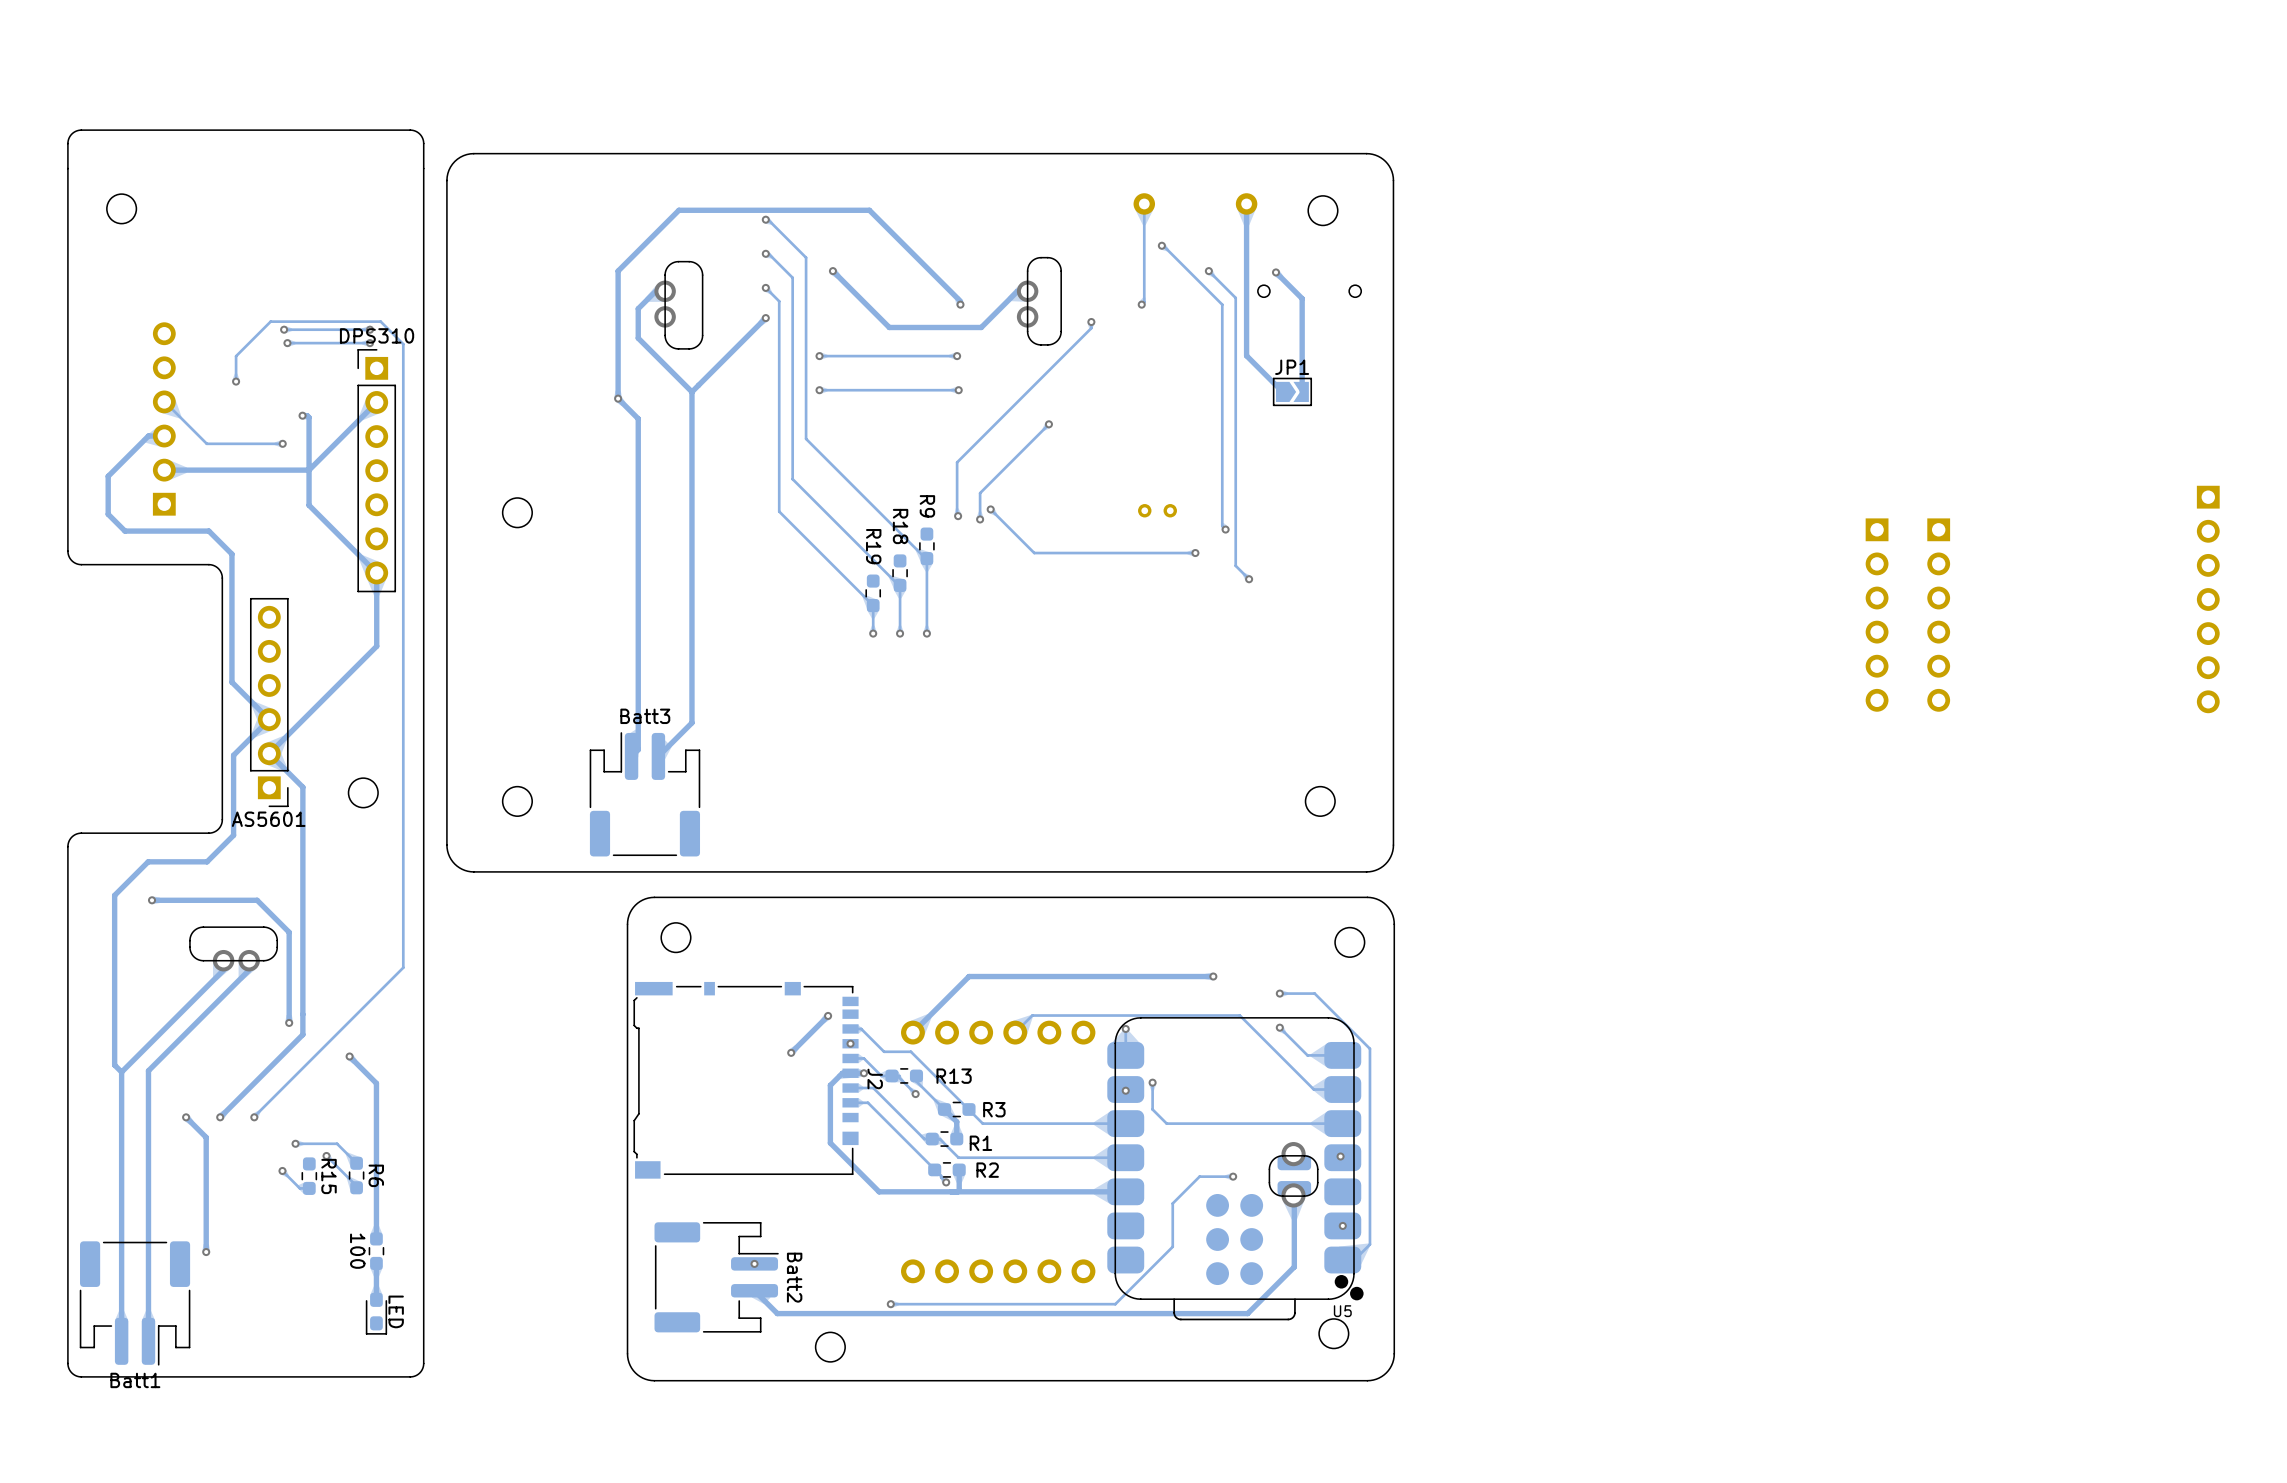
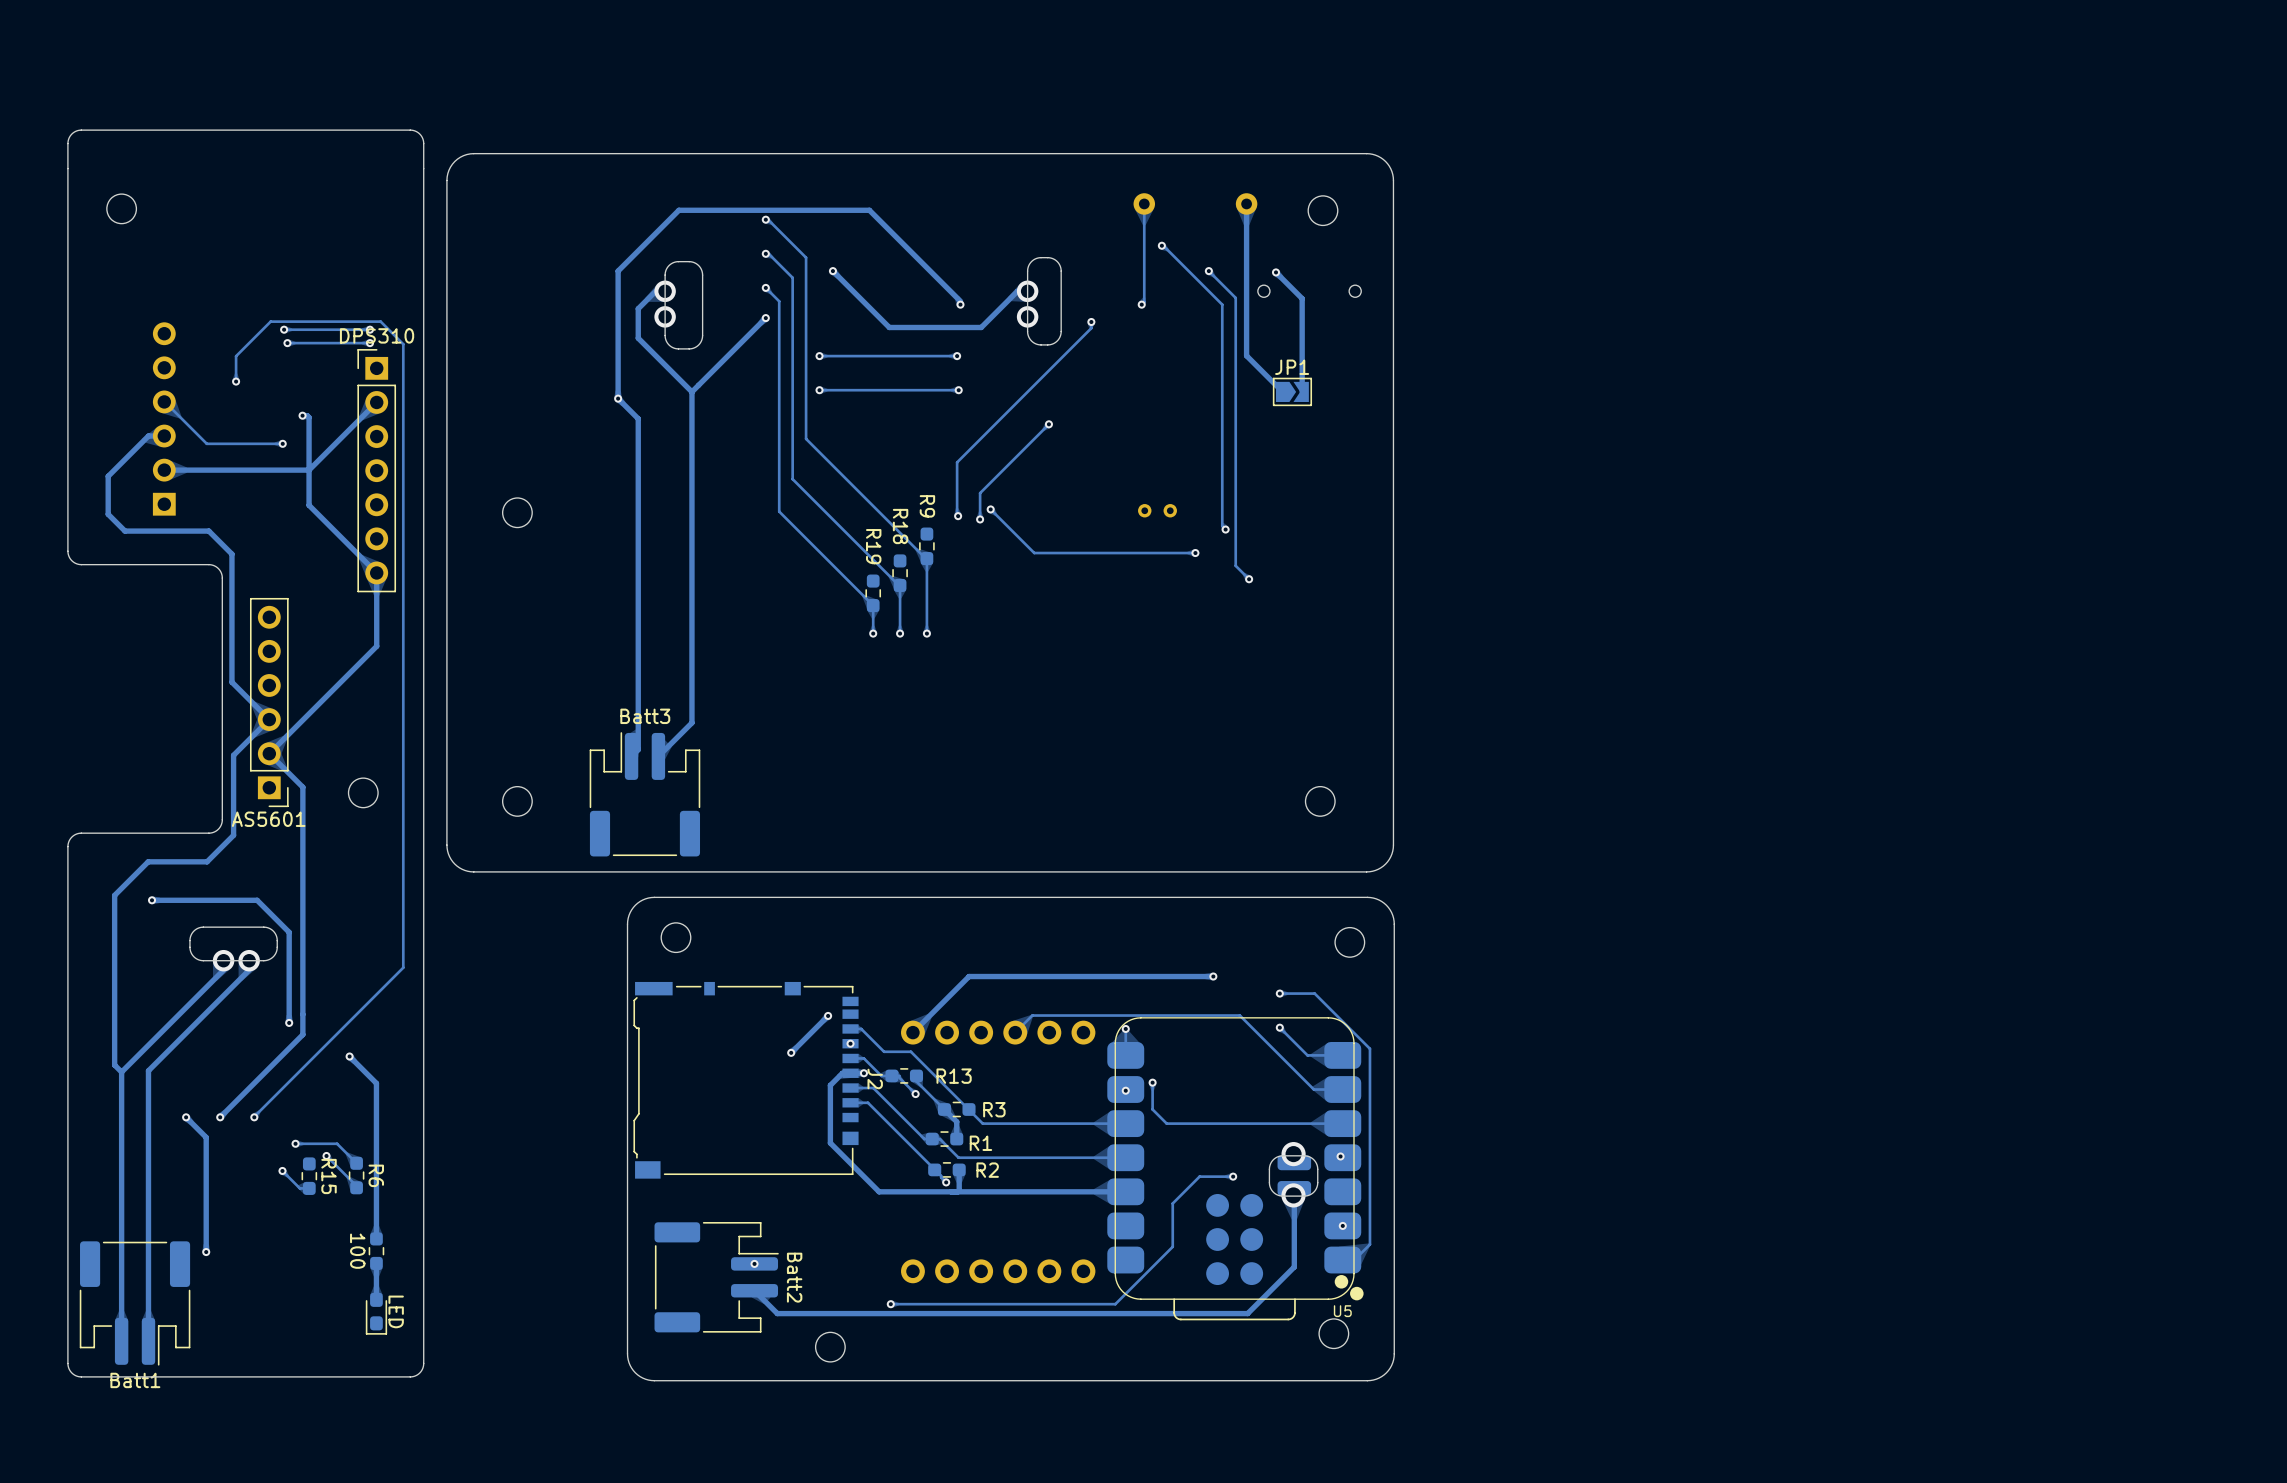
part: (2208, 599) -> none
part: (1877, 615) -> none
part: (1938, 615) -> none

